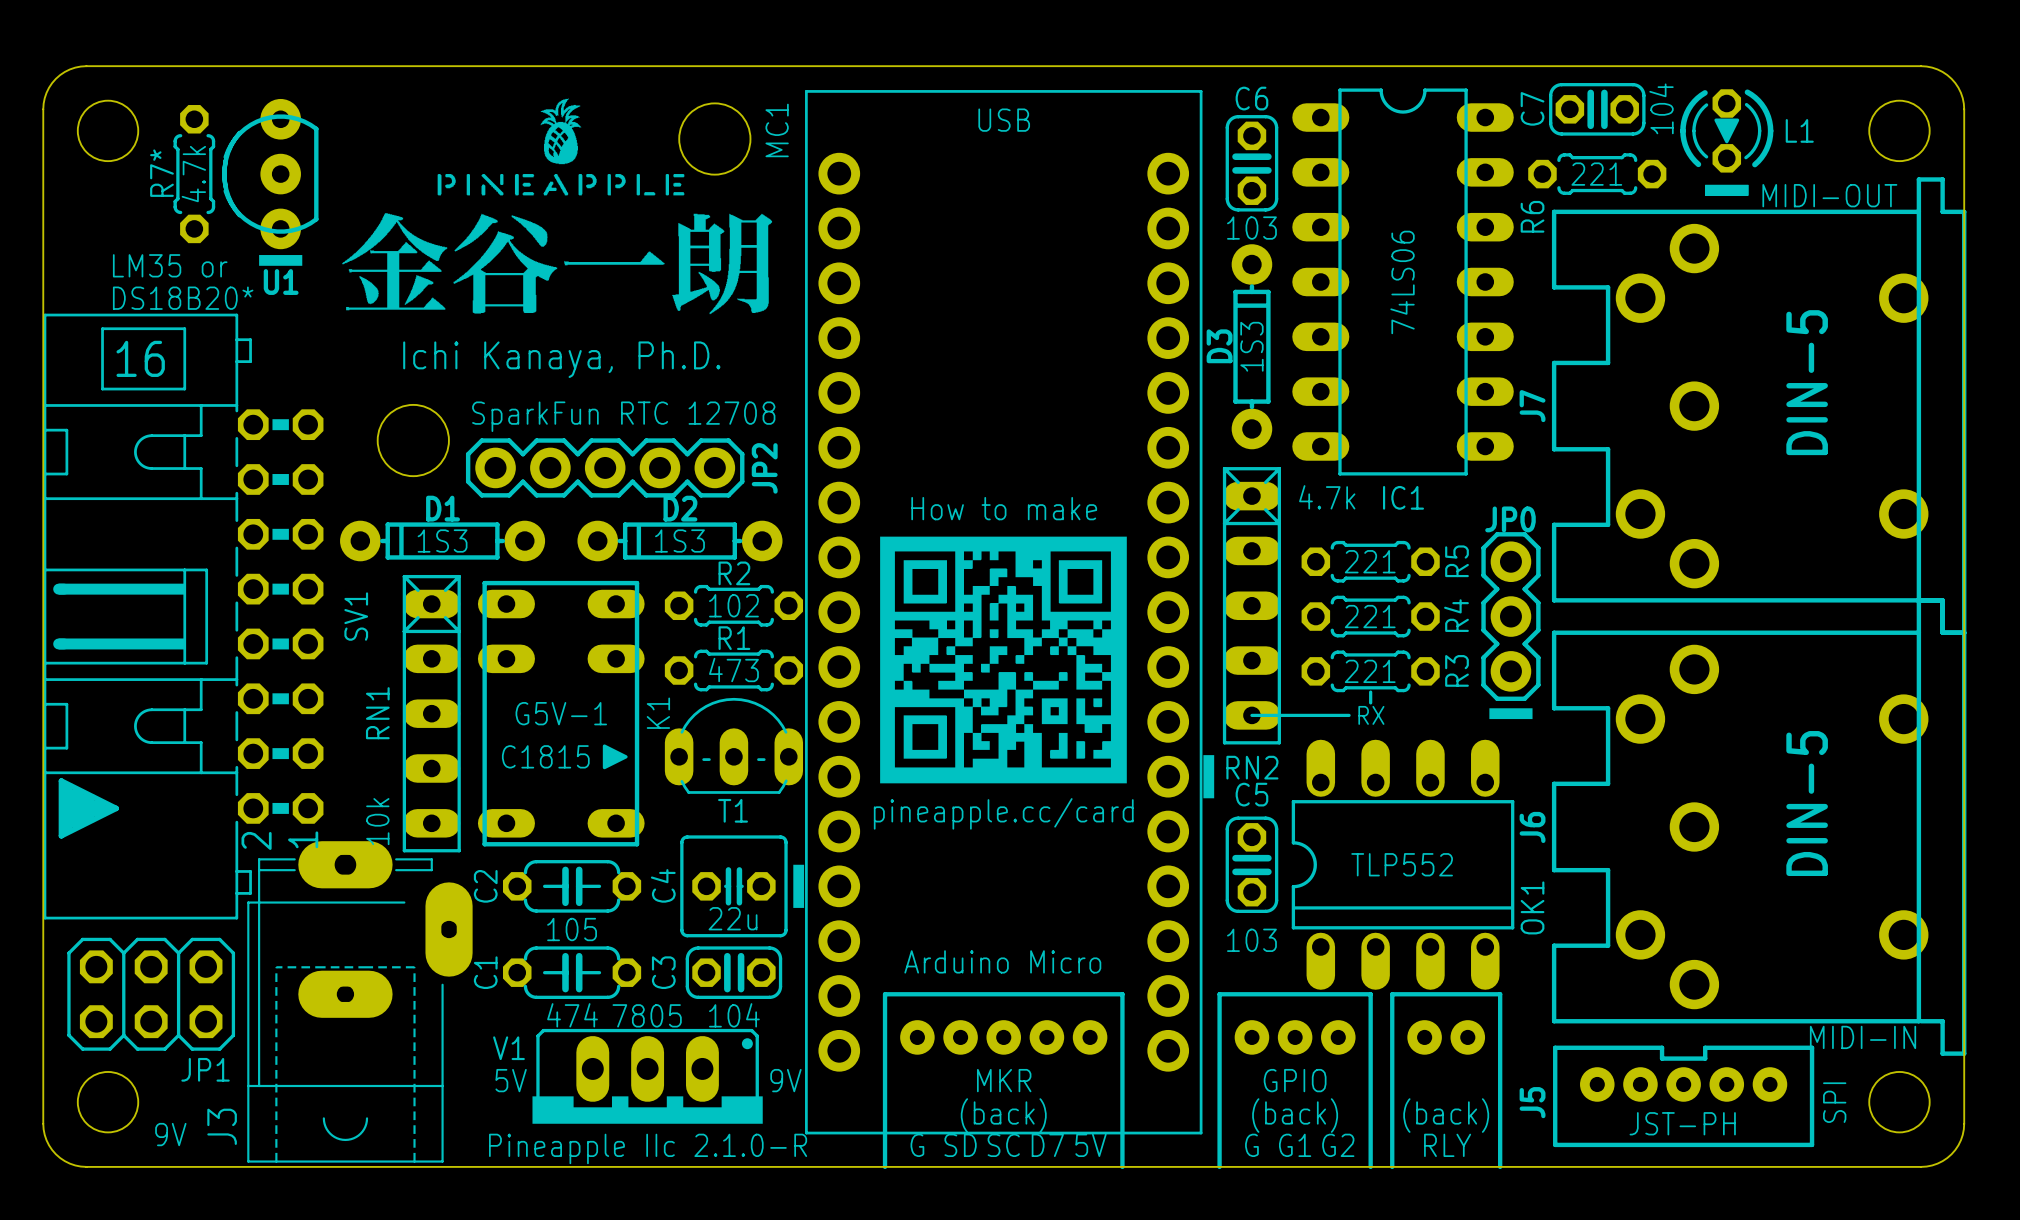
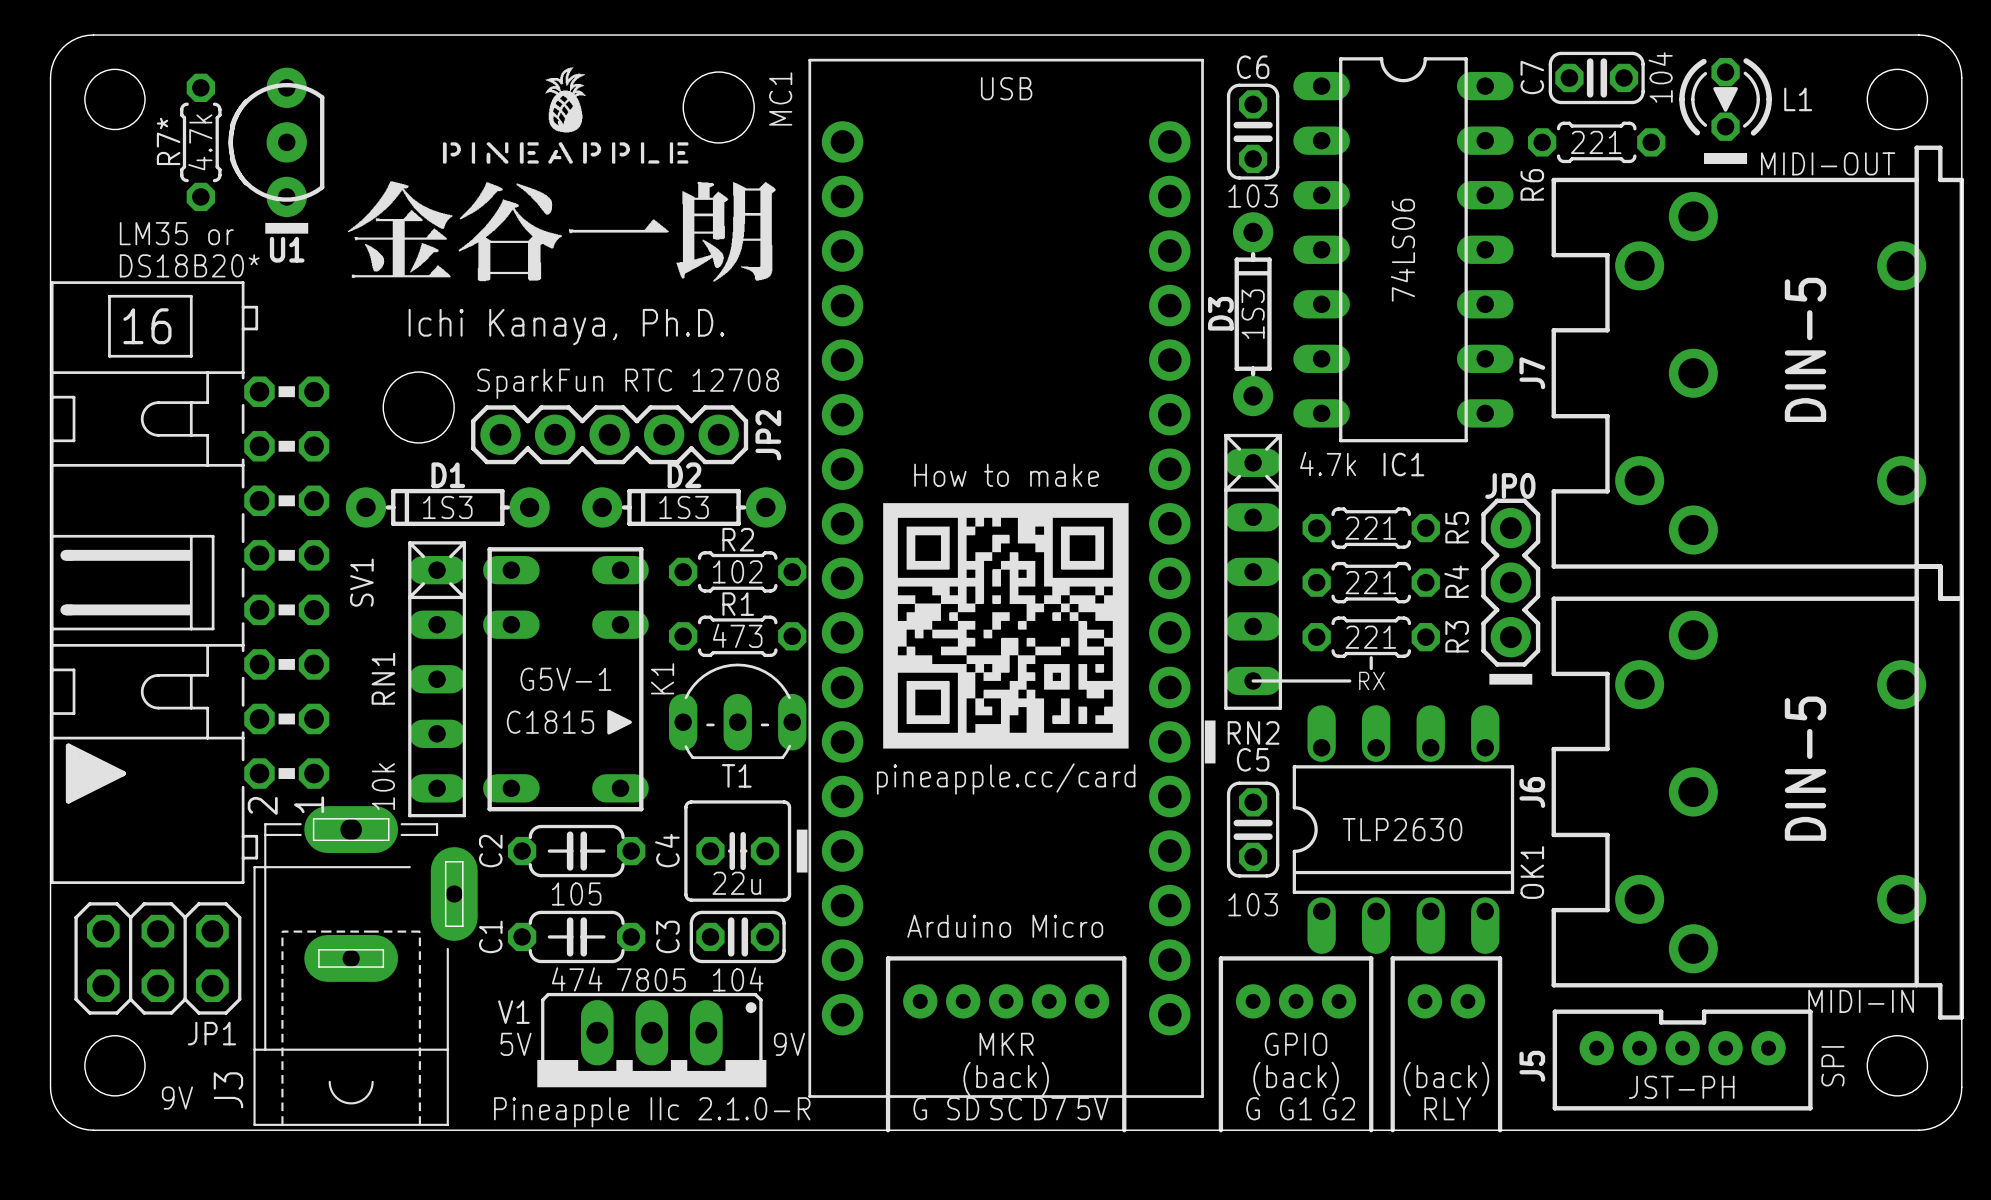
text: TLP552 (1402, 864) -> TLP2630 (1402, 829)

